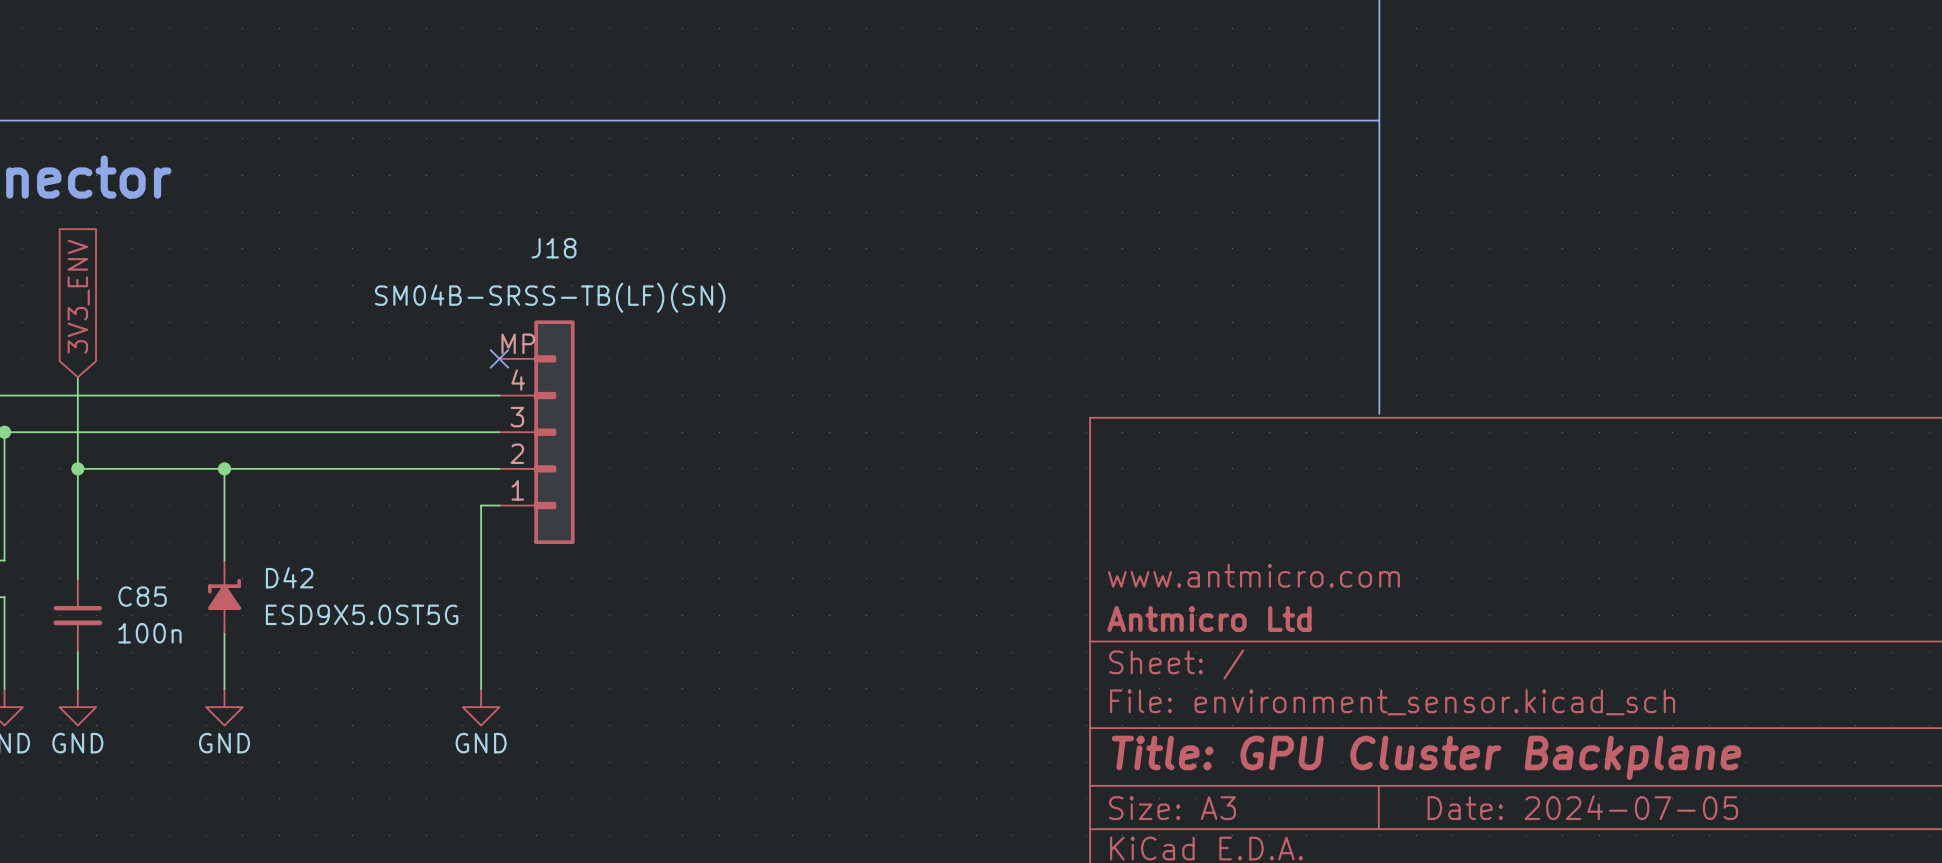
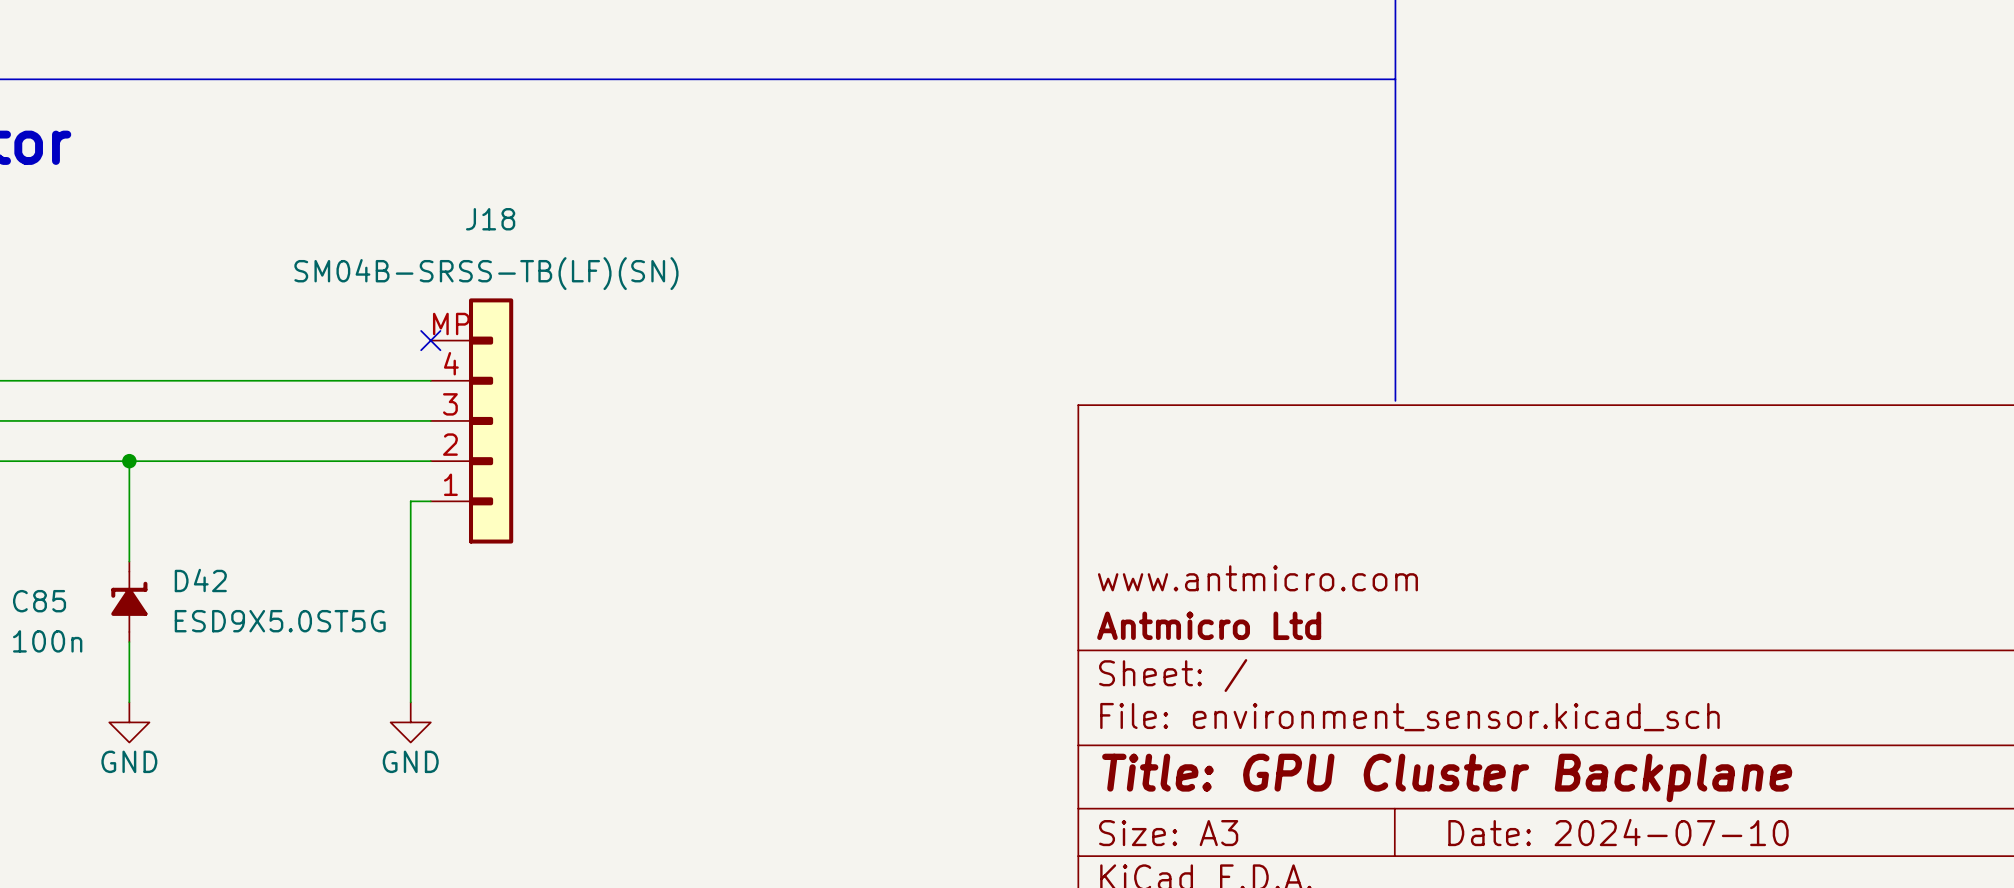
title block: Date: 2024-07-05 (1582, 807) -> Date: 2024-07-10 (1618, 832)

